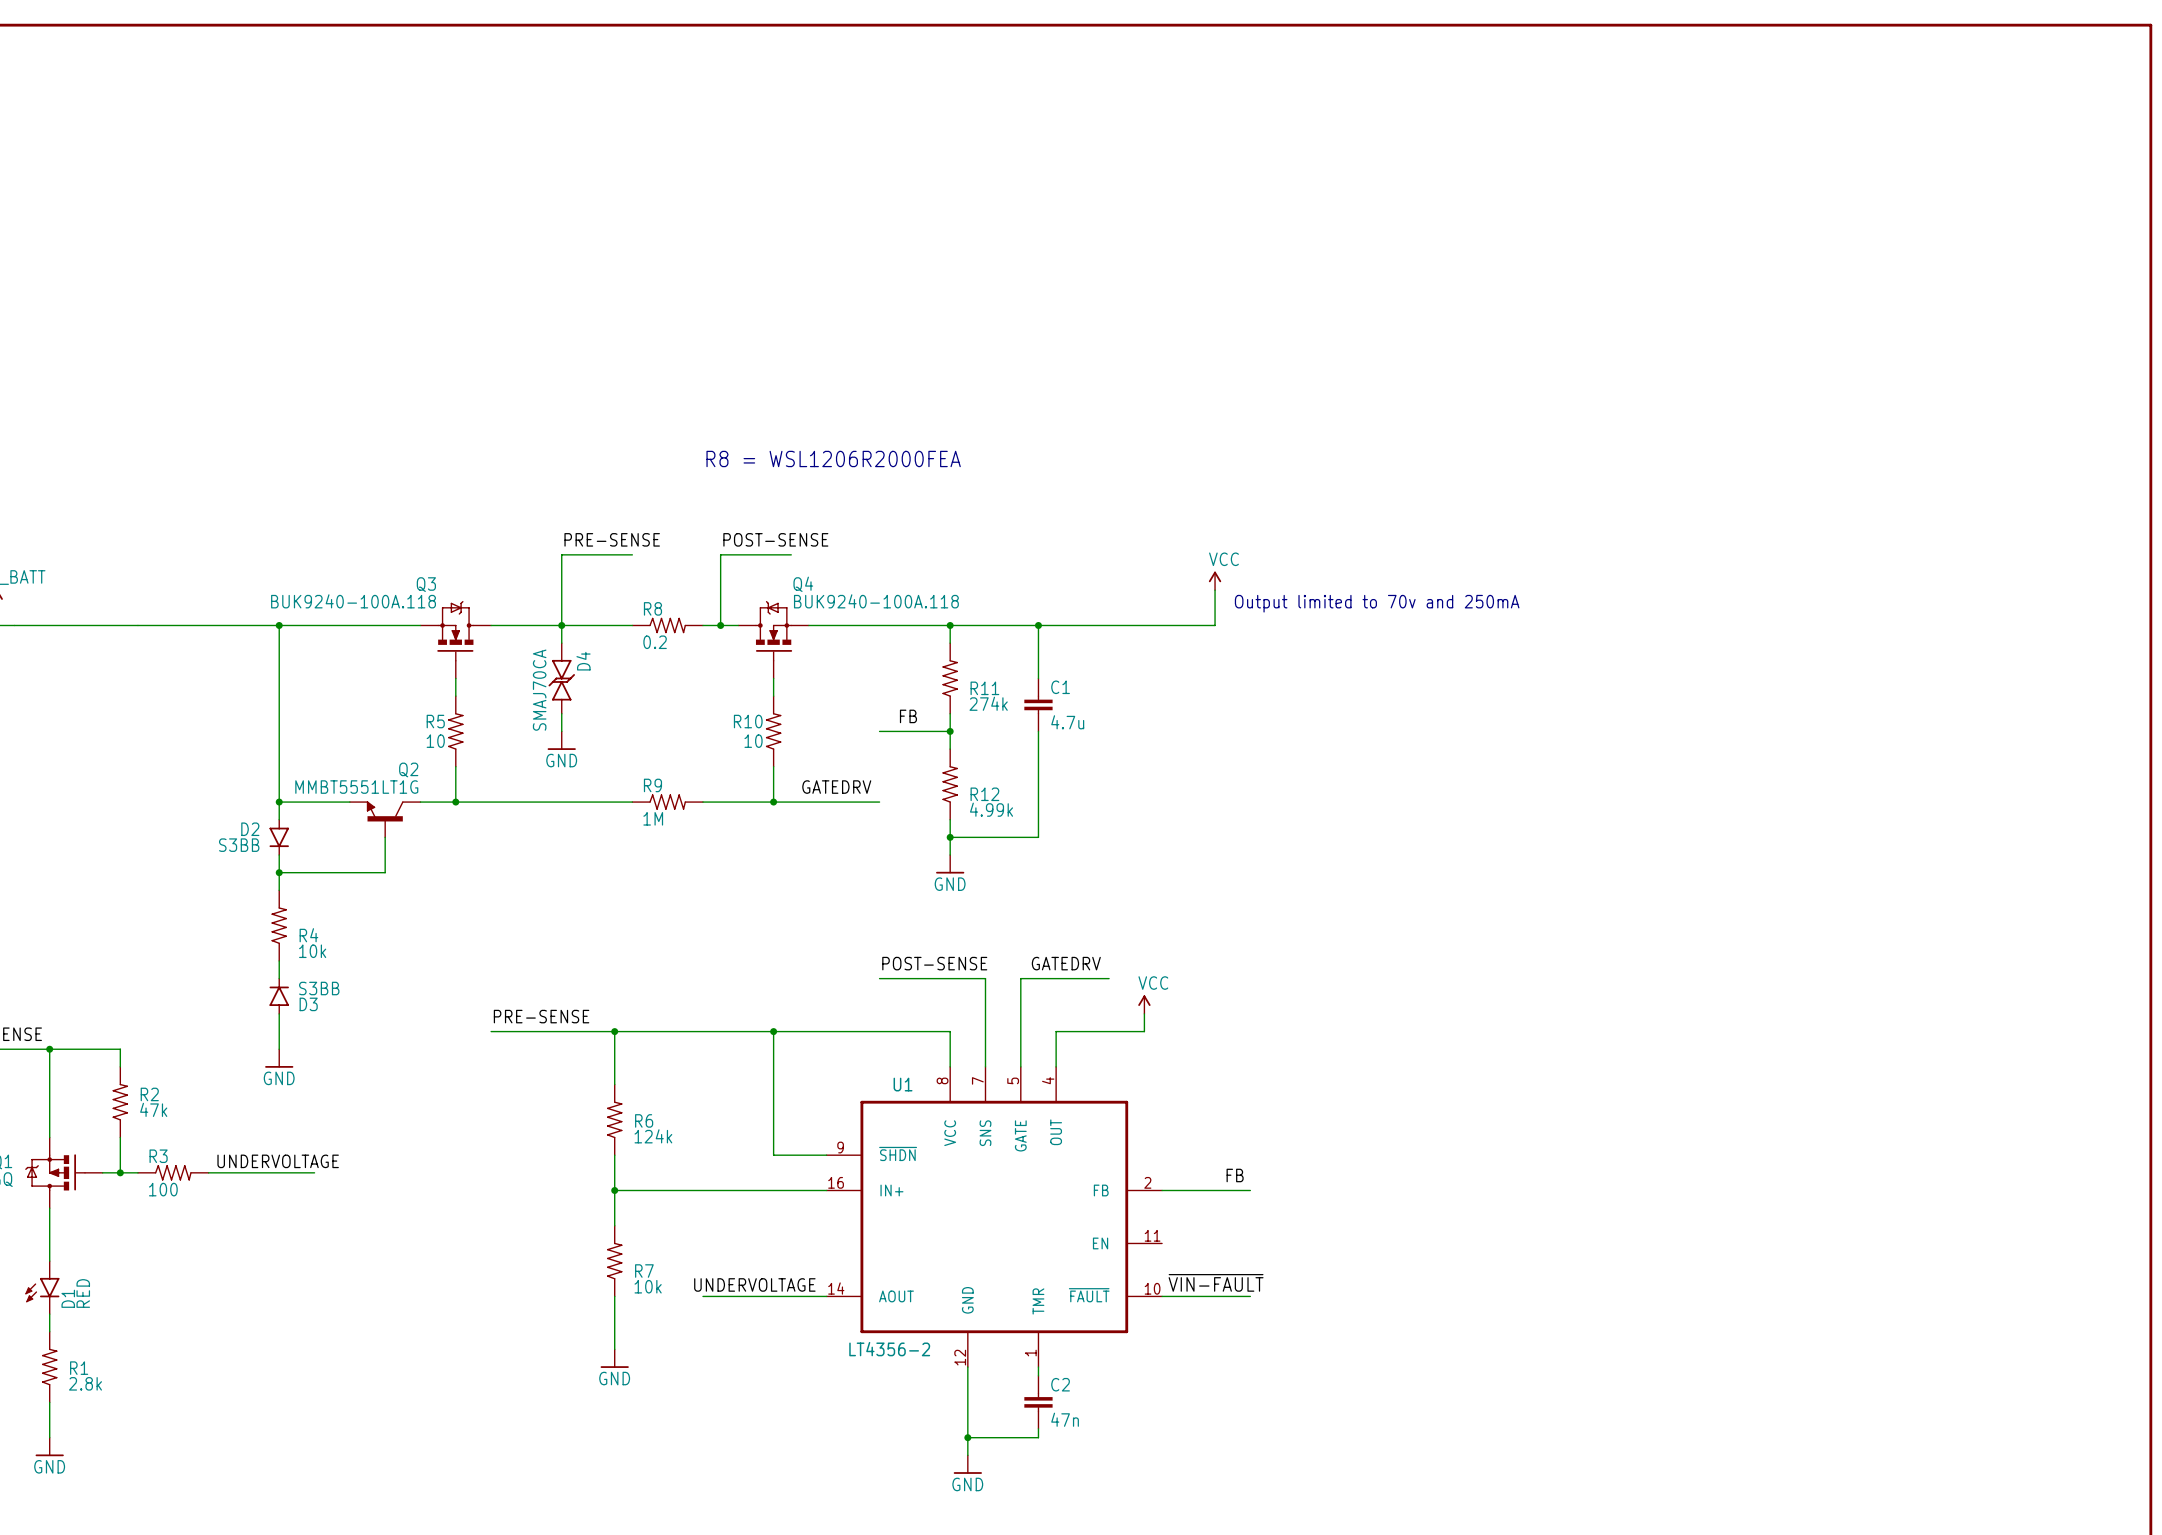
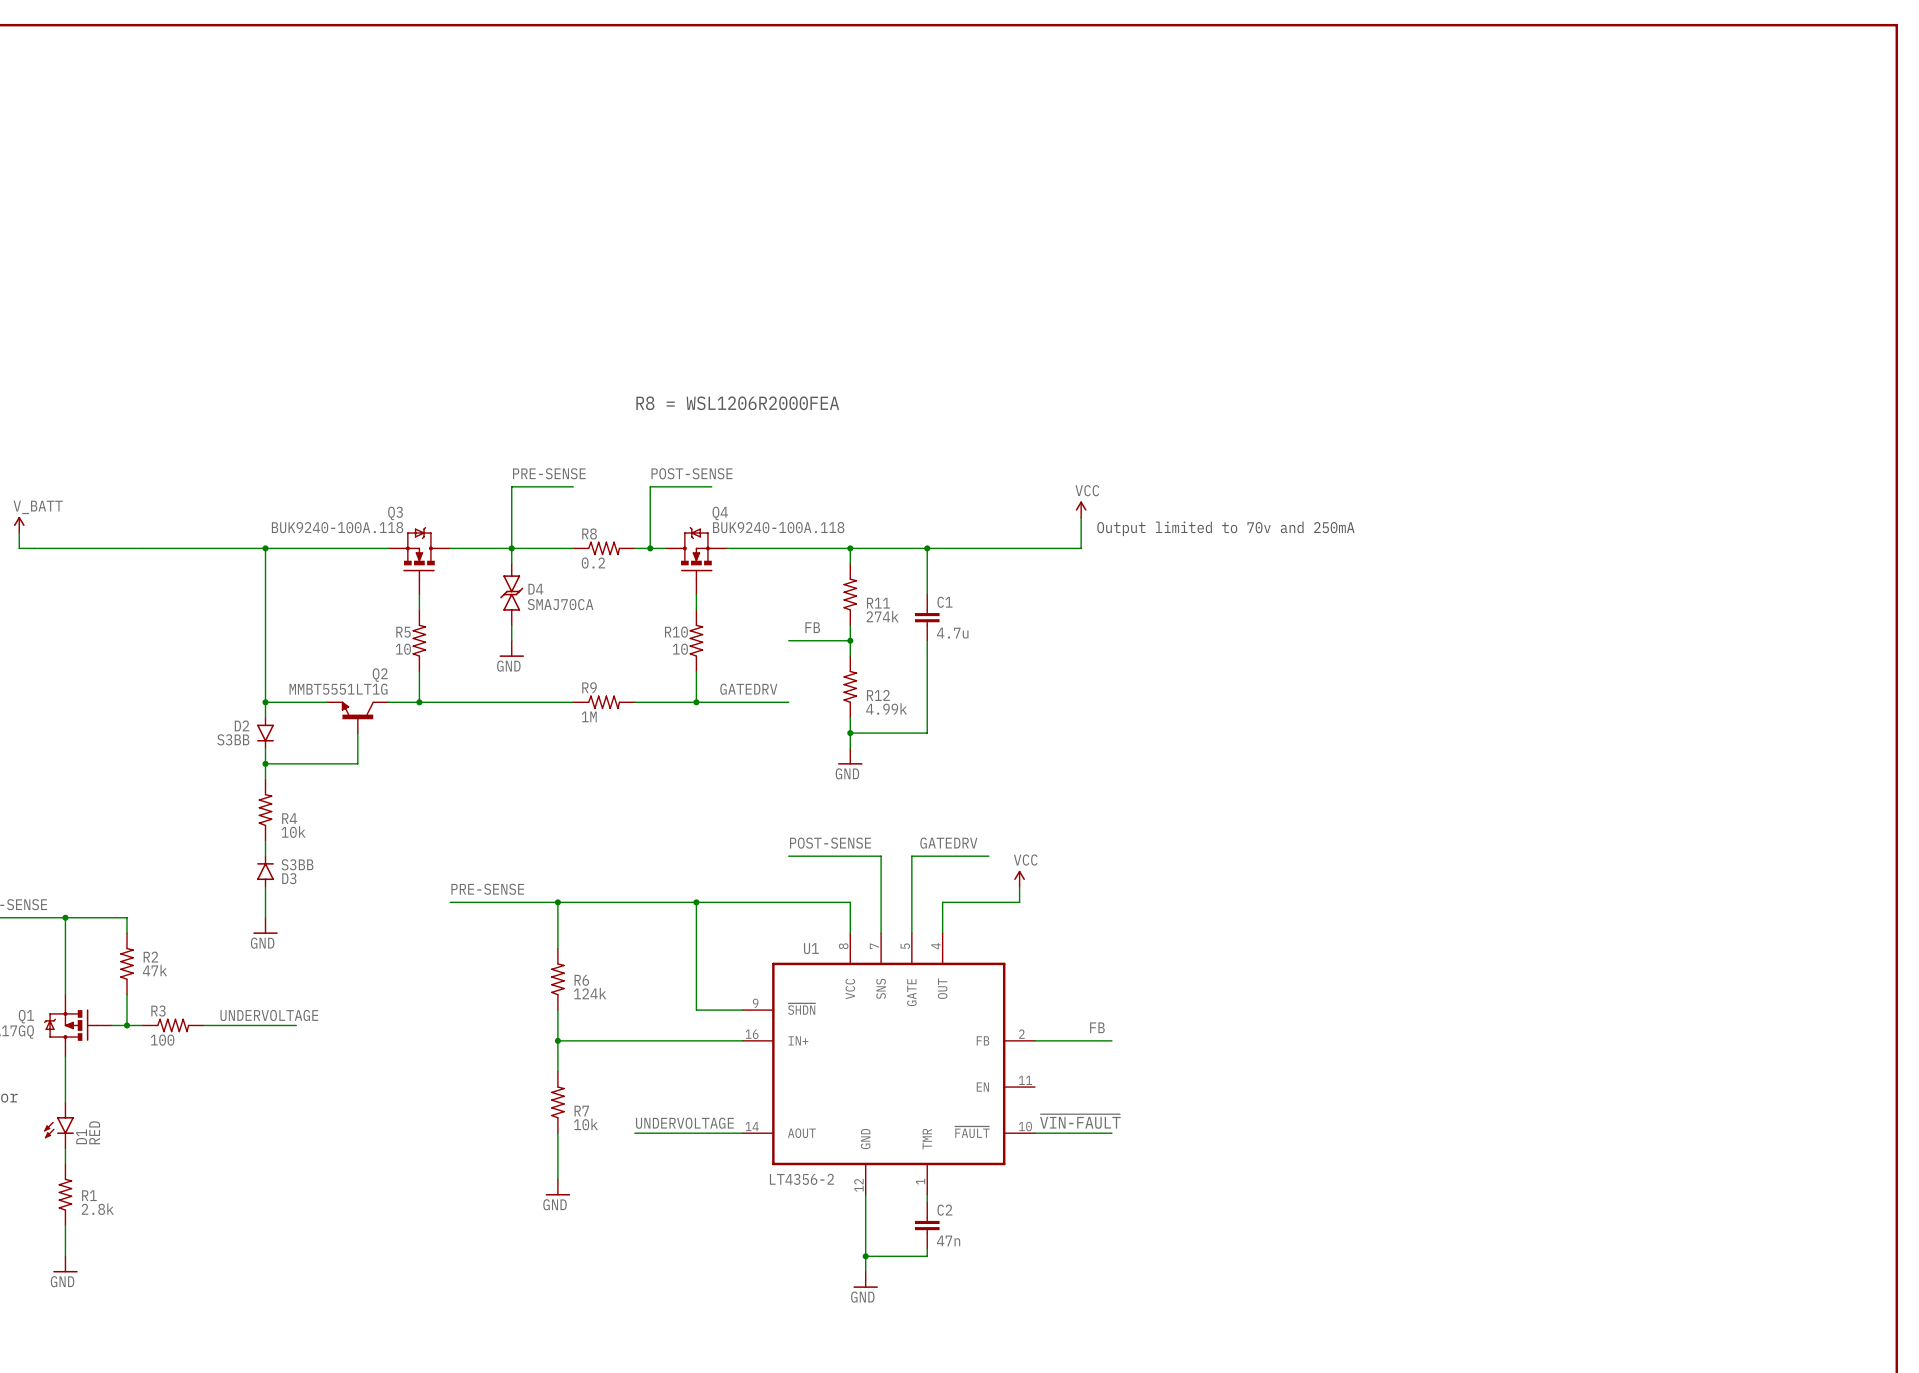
D4 rotation: 0° (561, 678) -> 180° (511, 594)
D4 value position: SMAJ70CA (539, 690) -> SMAJ70CA (560, 604)

